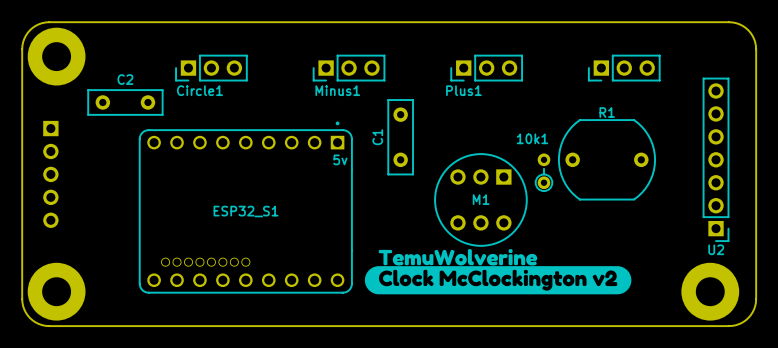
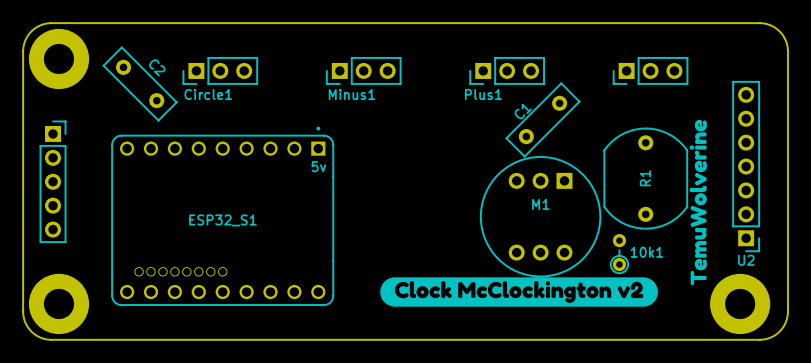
C2 rotation: 0° (125, 102) -> 45° clockwise (140, 83)
R1 name position: R1 (607, 112) -> R1 (645, 178)
drawing: none -> [689, 119, 707, 285]
ESP32_S1 footprint: [139, 121, 353, 294] -> [111, 126, 334, 306]
C1 rotation: 0° (400, 137) -> 45° clockwise (542, 119)
C1 position: (400, 137) -> (542, 119)
10k1 name position: 10k1 (532, 138) -> 10k1 (646, 252)
M1 footprint: [434, 153, 528, 247] -> [480, 156, 601, 277]
R1 rotation: 0° (606, 159) -> 90° clockwise (645, 178)
10k1 position: (543, 172) -> (619, 253)
part side: bottom (50, 174) -> top (53, 181)
drawing: [378, 249, 538, 266] -> none

